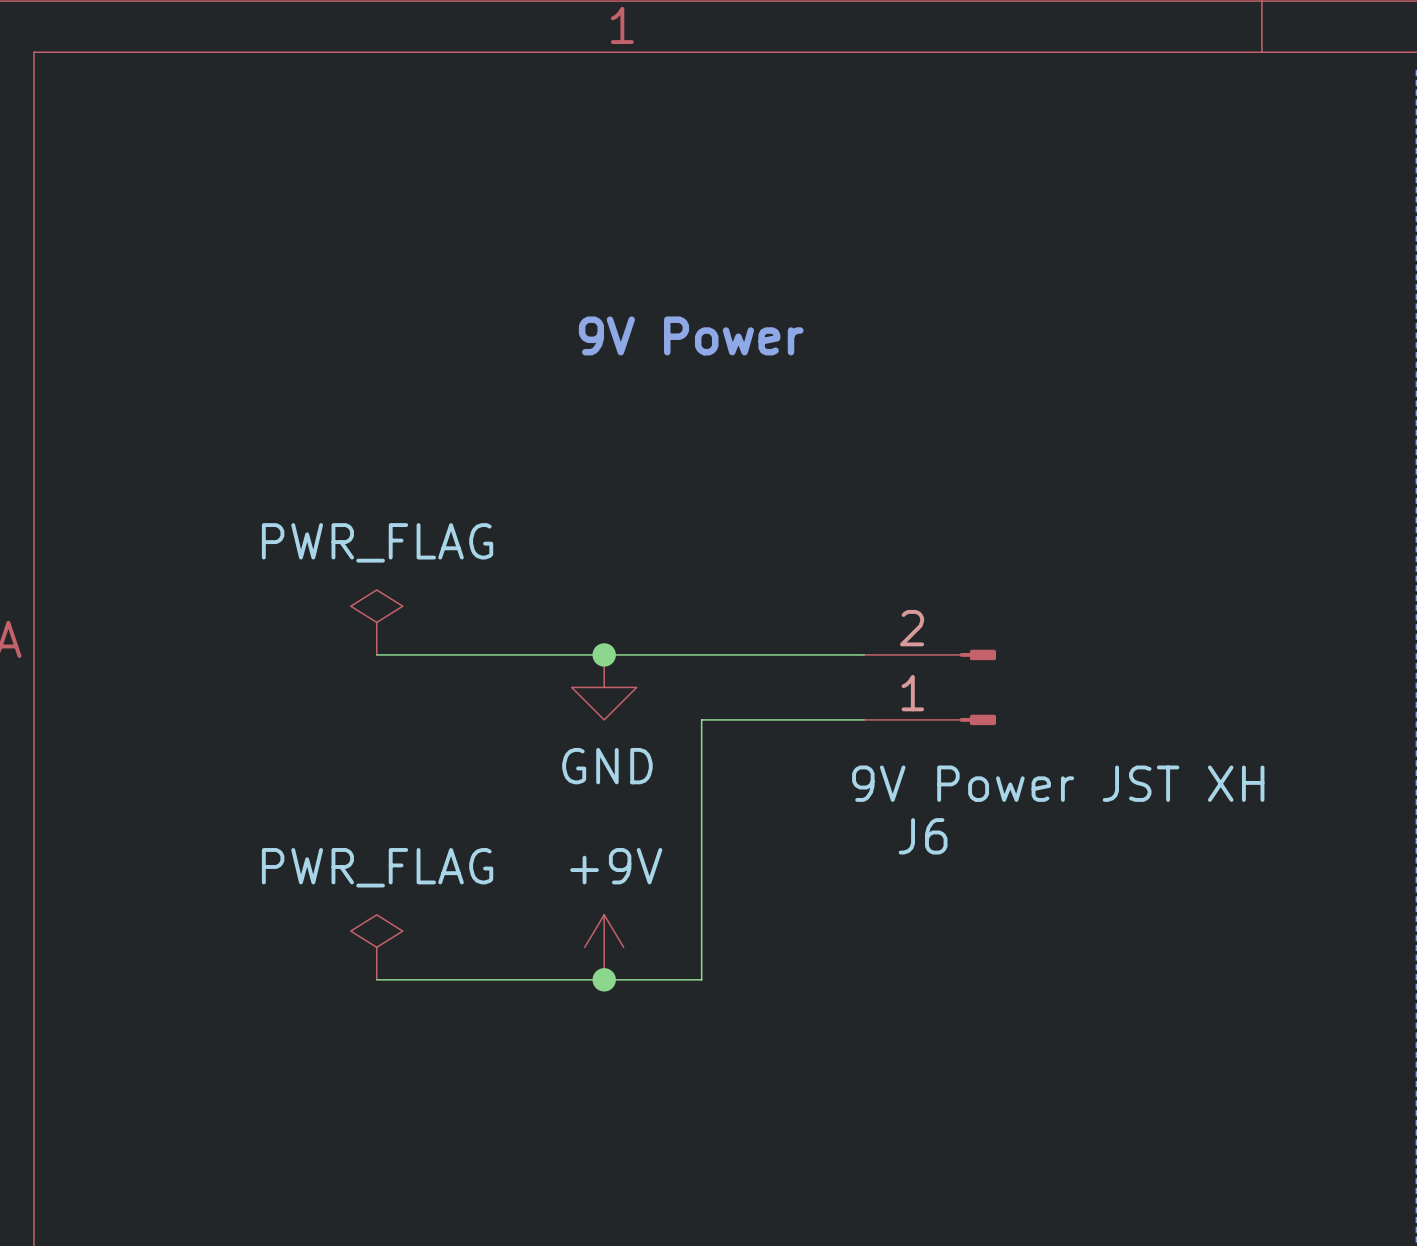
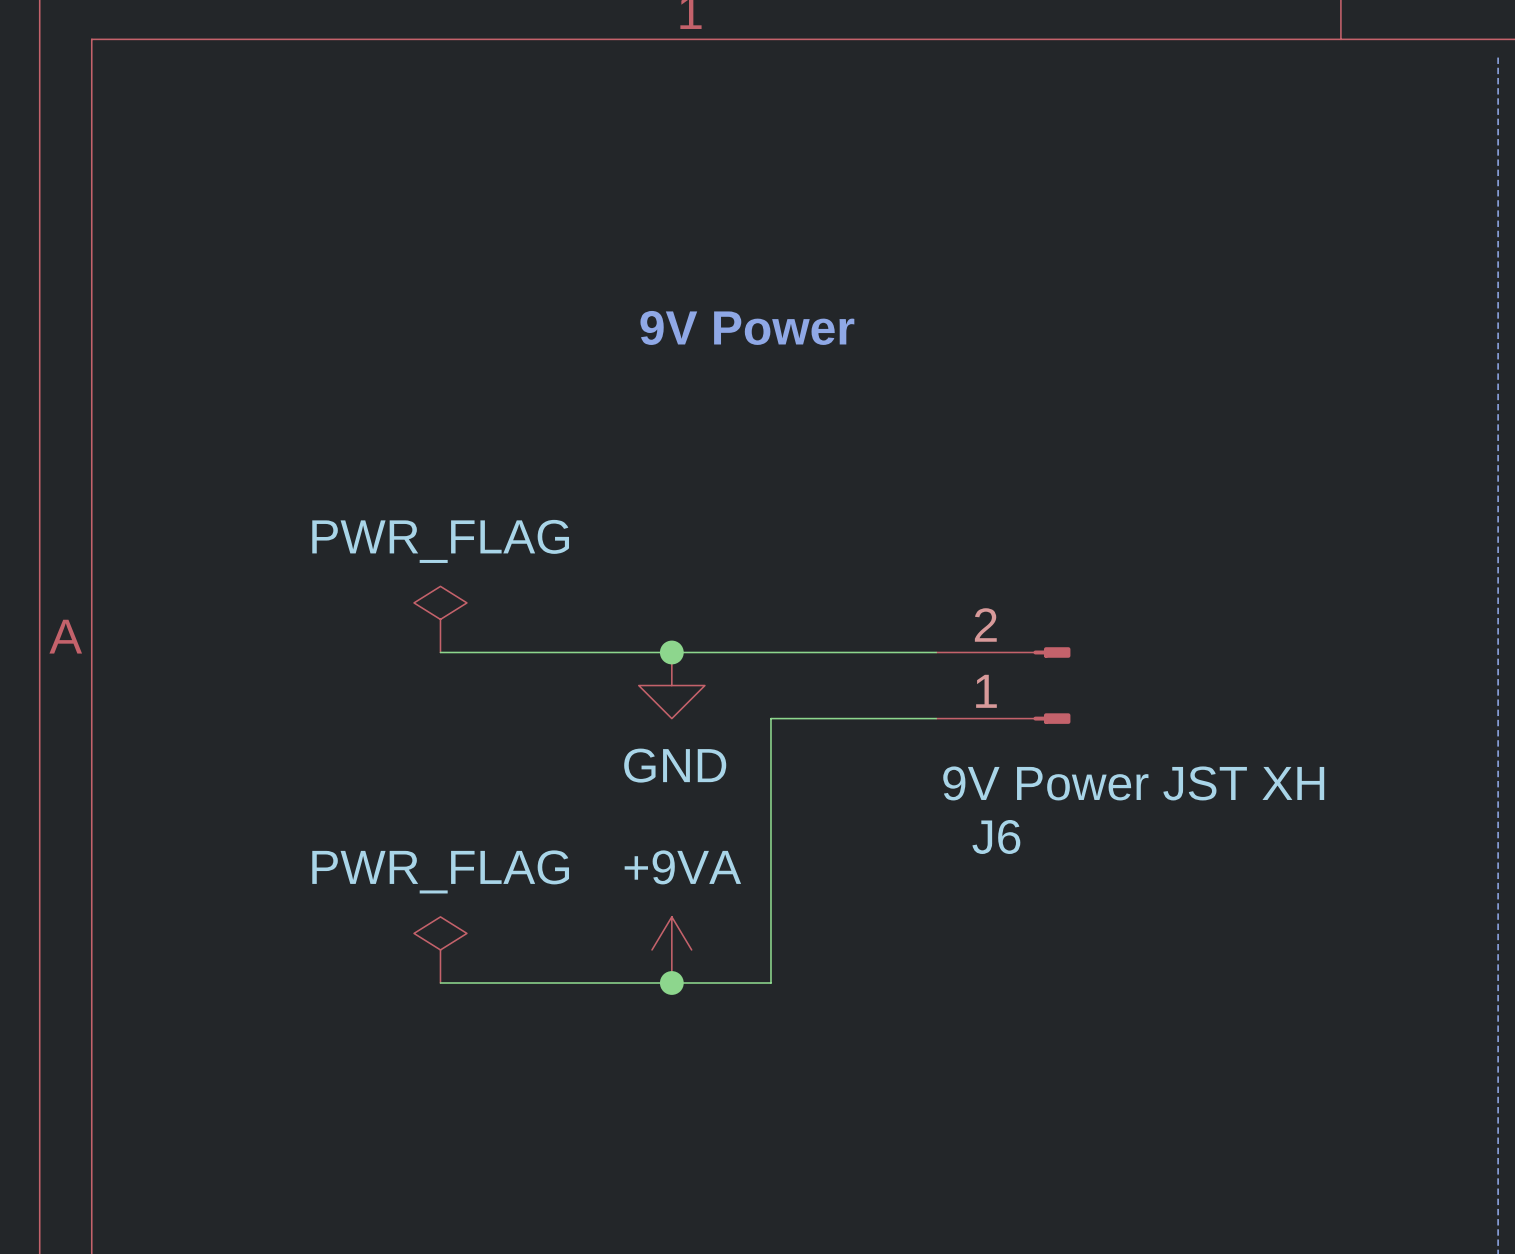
power symbol: +9V (604, 947) -> +9VA (671, 949)

